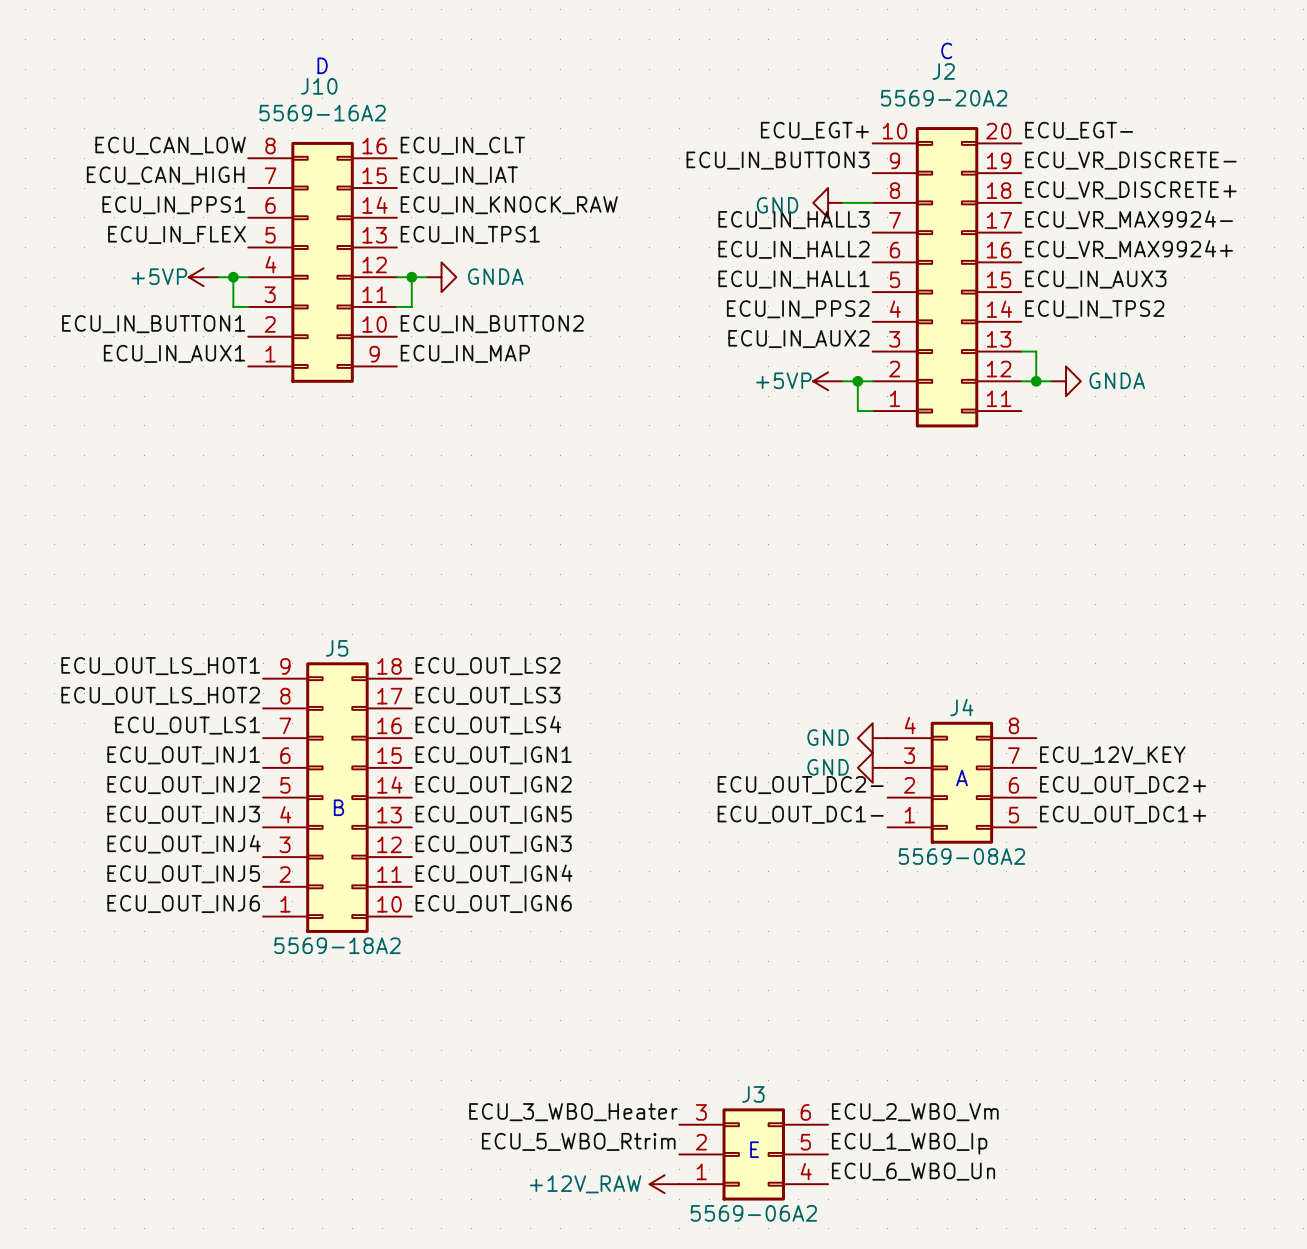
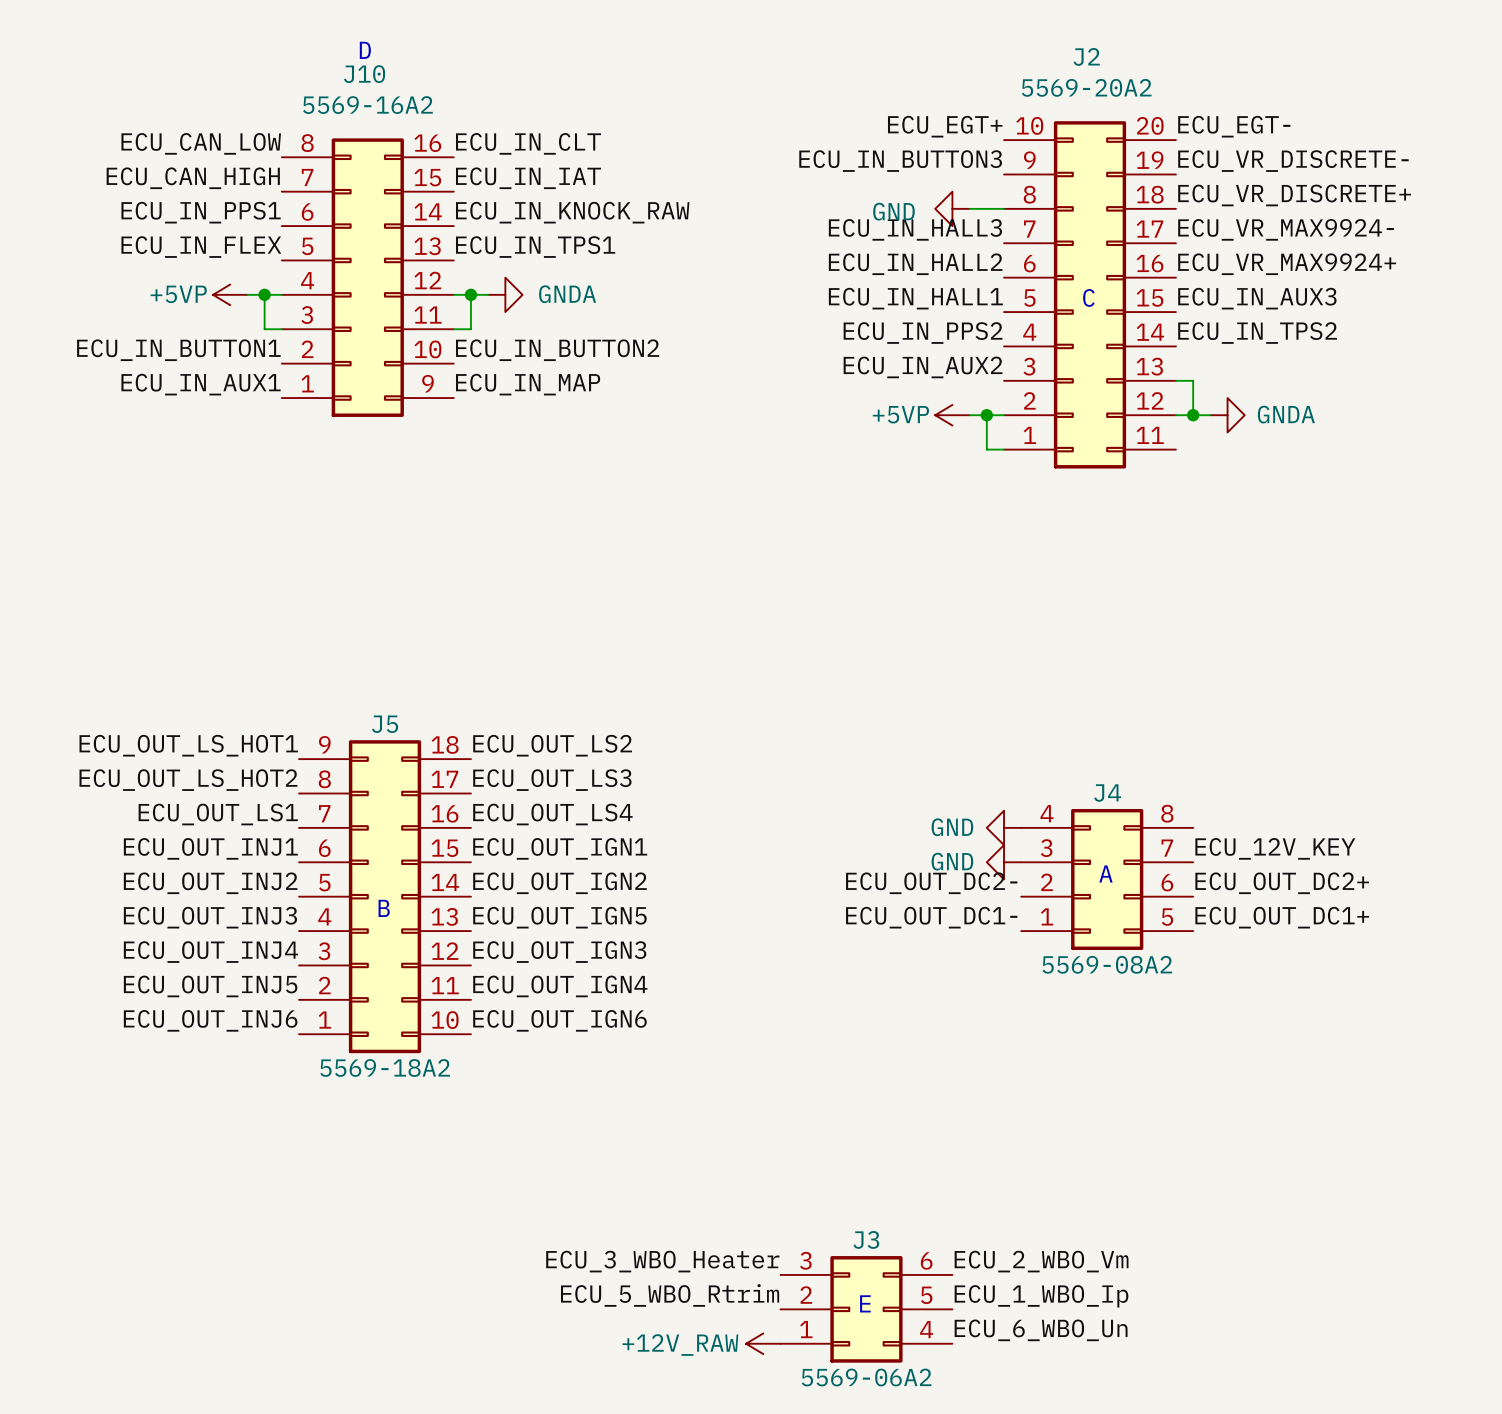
text position: C (946, 50) -> C (1088, 297)

